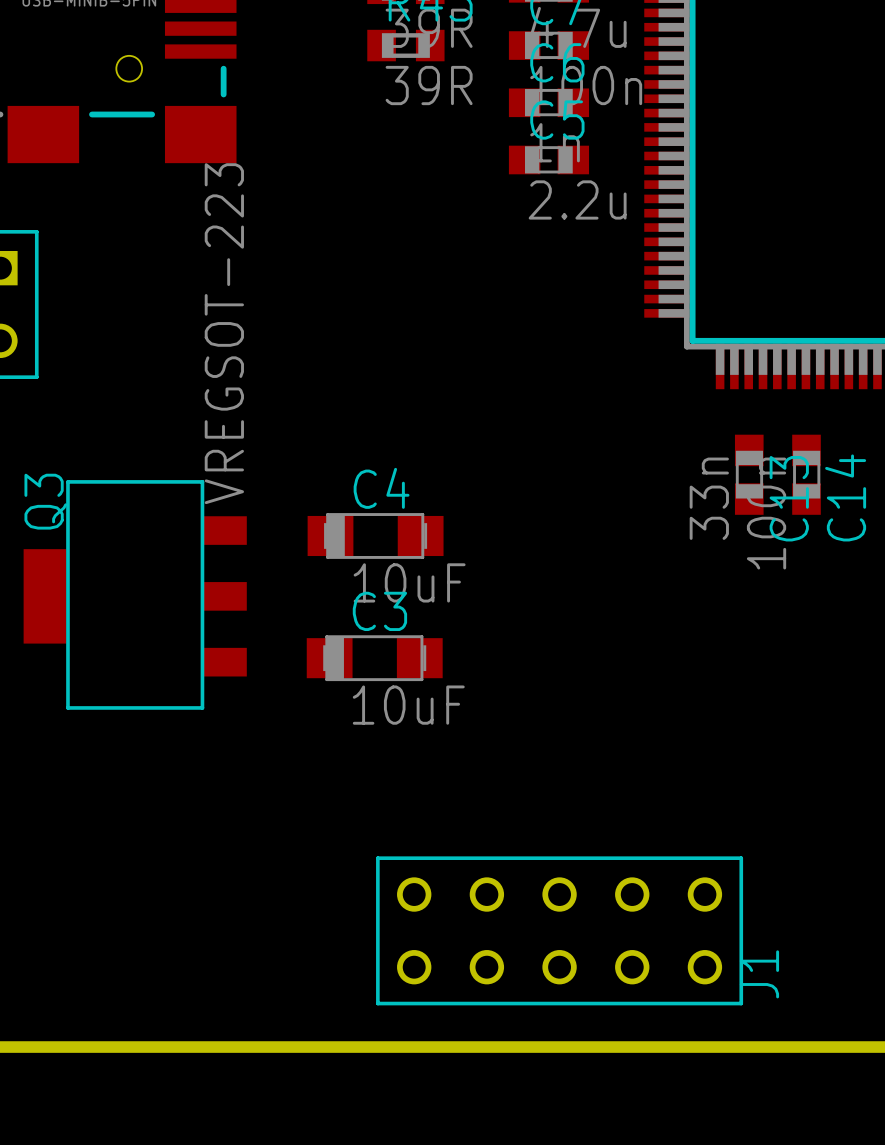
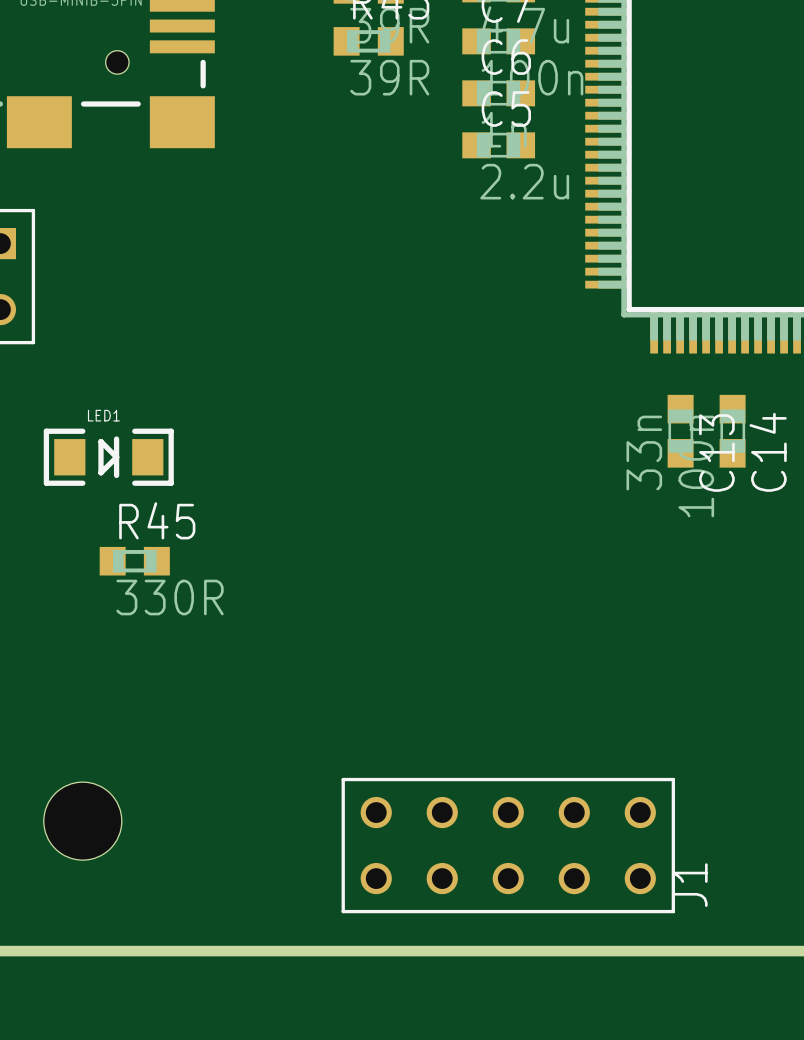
LED1: none -> (108, 457)
C4: 10uF (375, 535) -> none
Q3: VREGSOT-223 (135, 594) -> none
R45: none -> 330R (134, 561)
C3: 10uF (374, 658) -> none
hole: none -> (82, 821)

